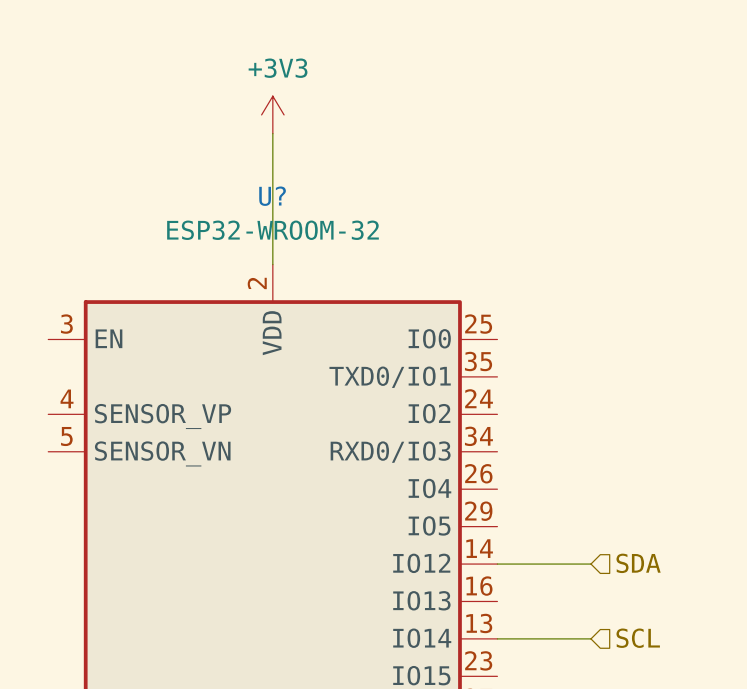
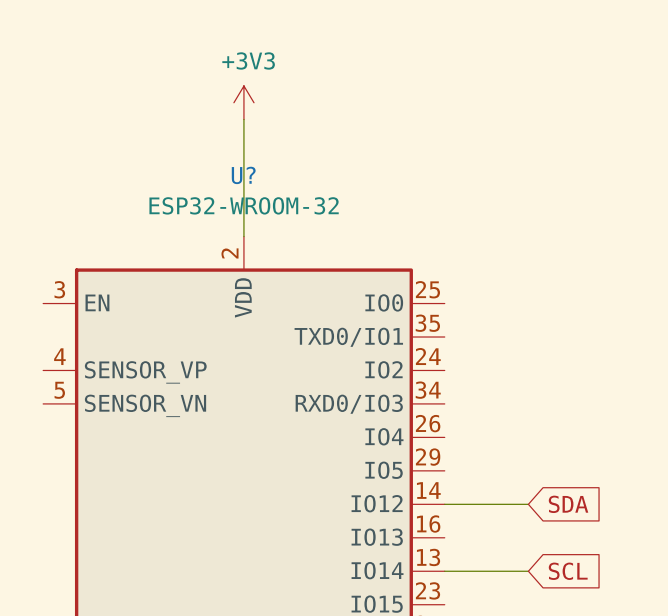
hierarchical label: SDA (638, 563) -> none
global label: none -> SDA (568, 504)
global label: none -> SCL (568, 571)
hierarchical label: SCL (638, 638) -> none

